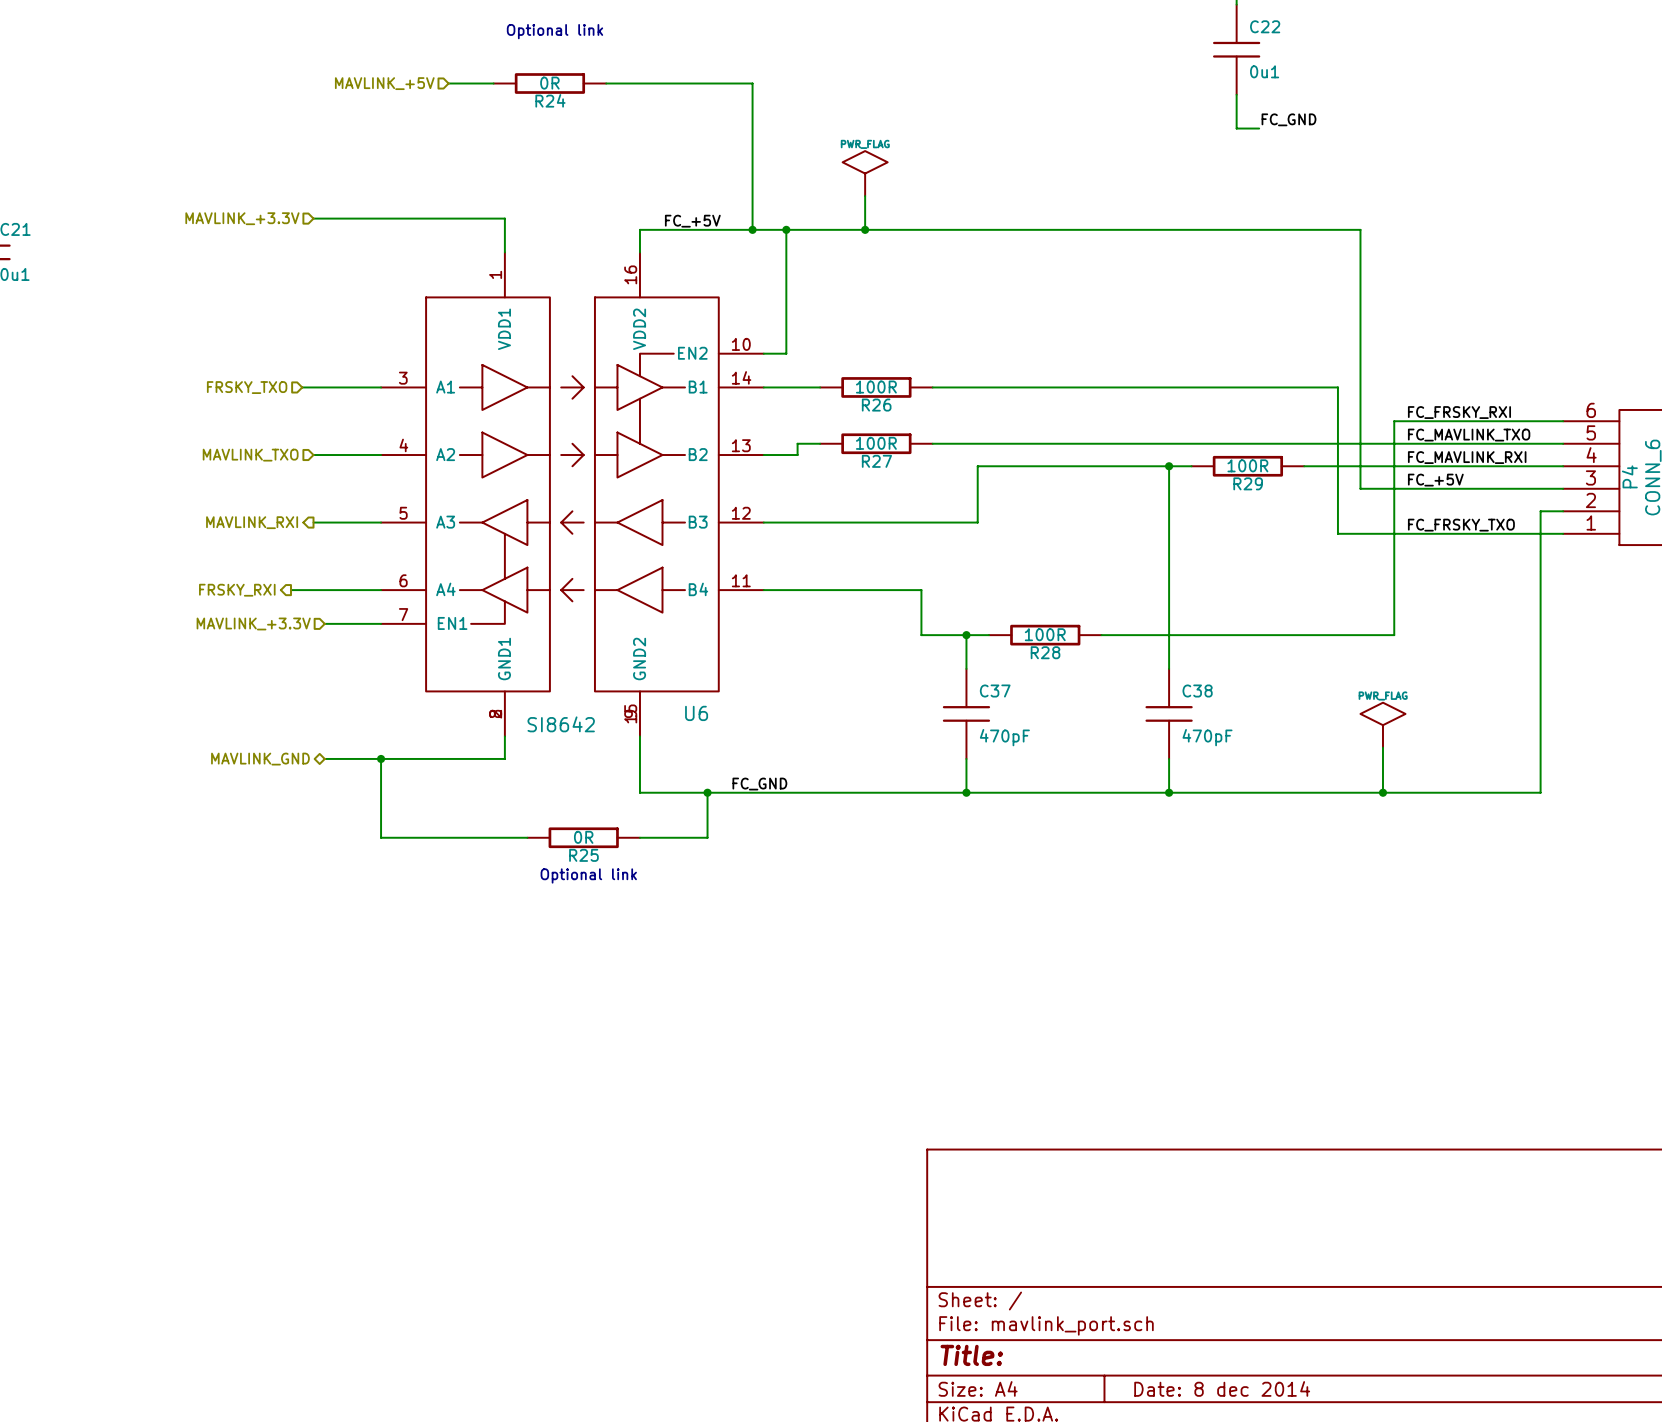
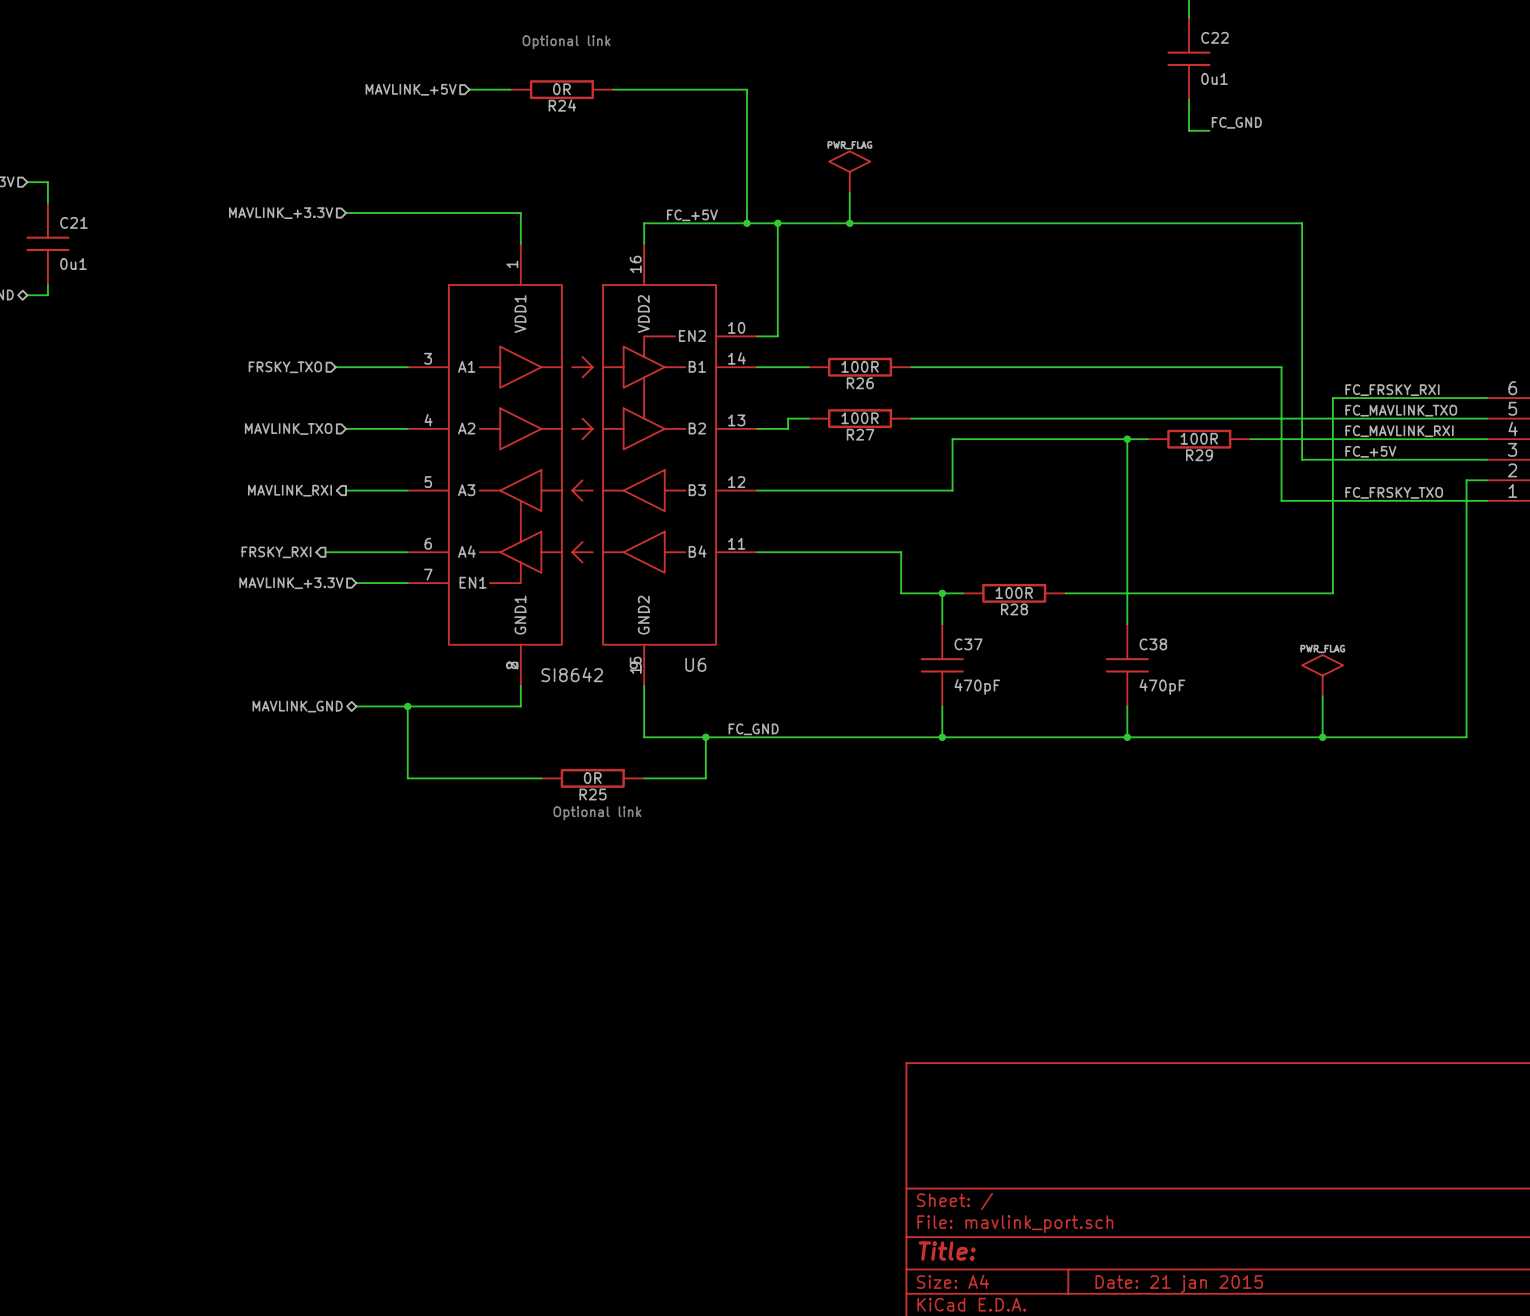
title block: Date: 8 dec 2014 (1222, 1388) -> Date: 21 jan 2015 (1179, 1284)

